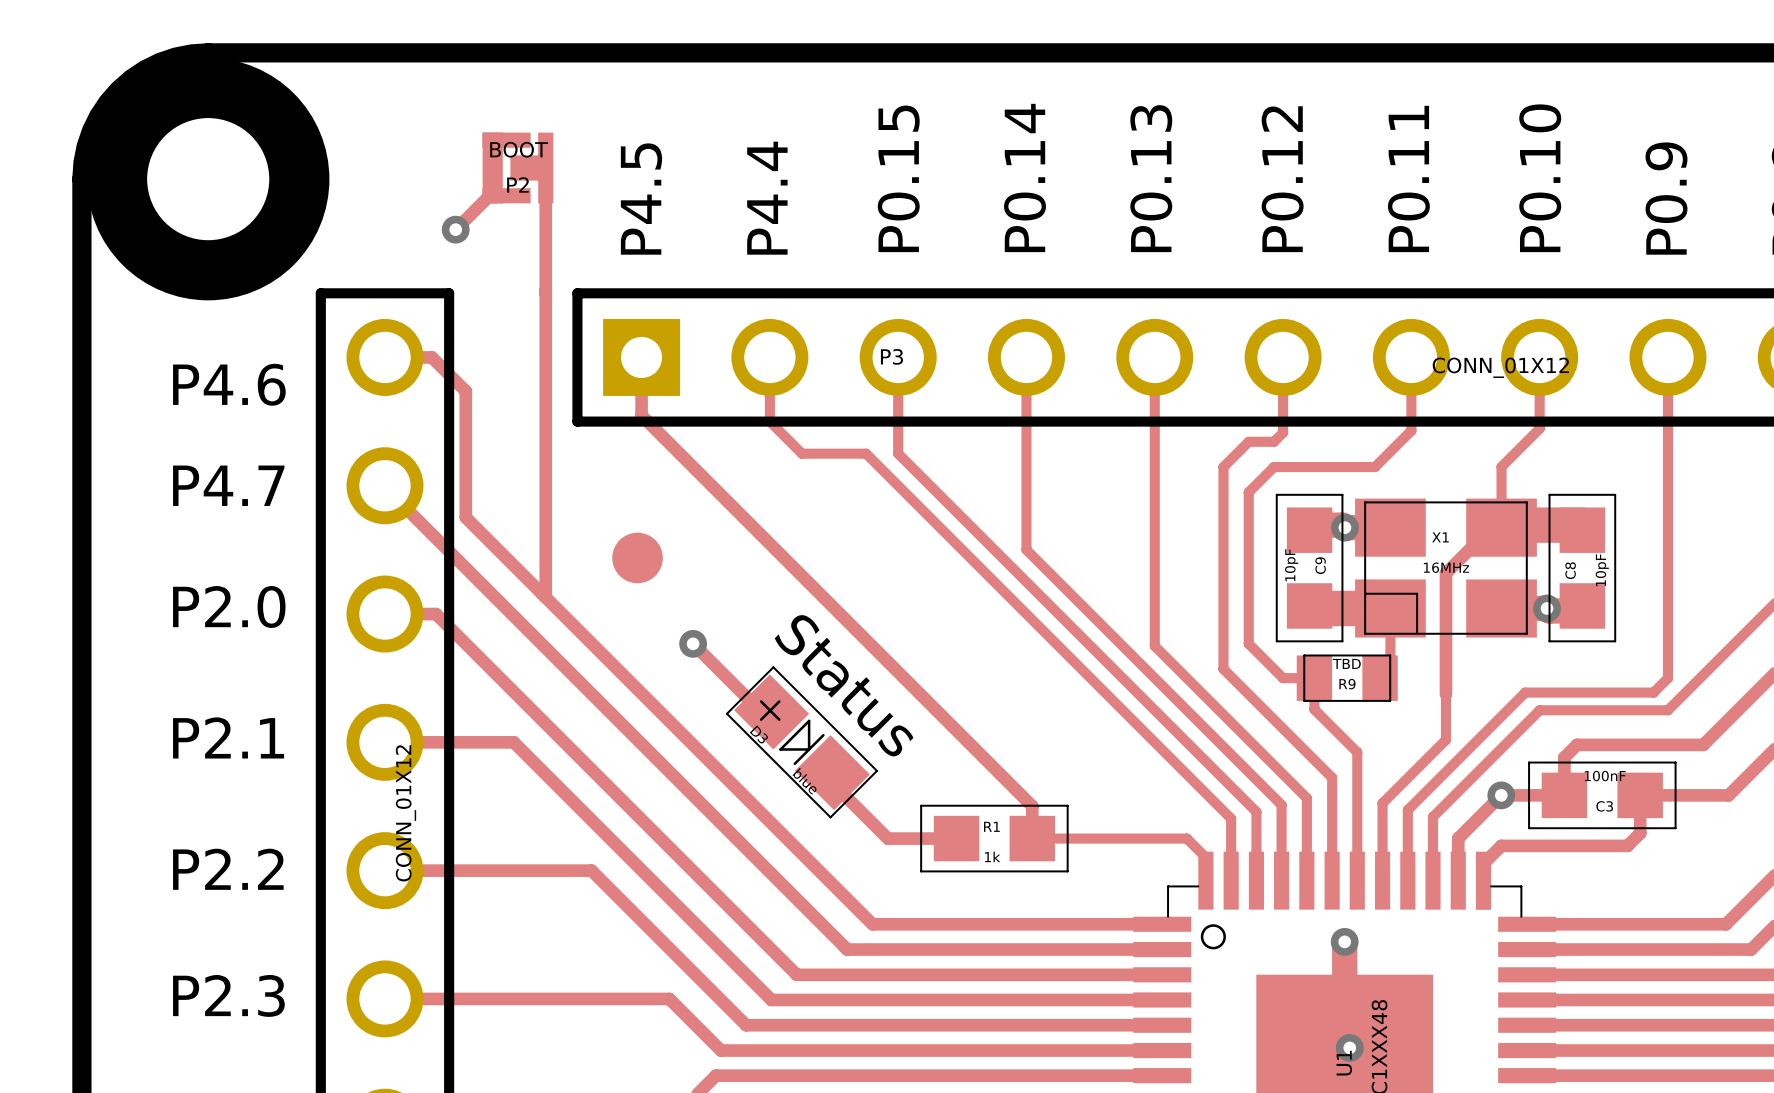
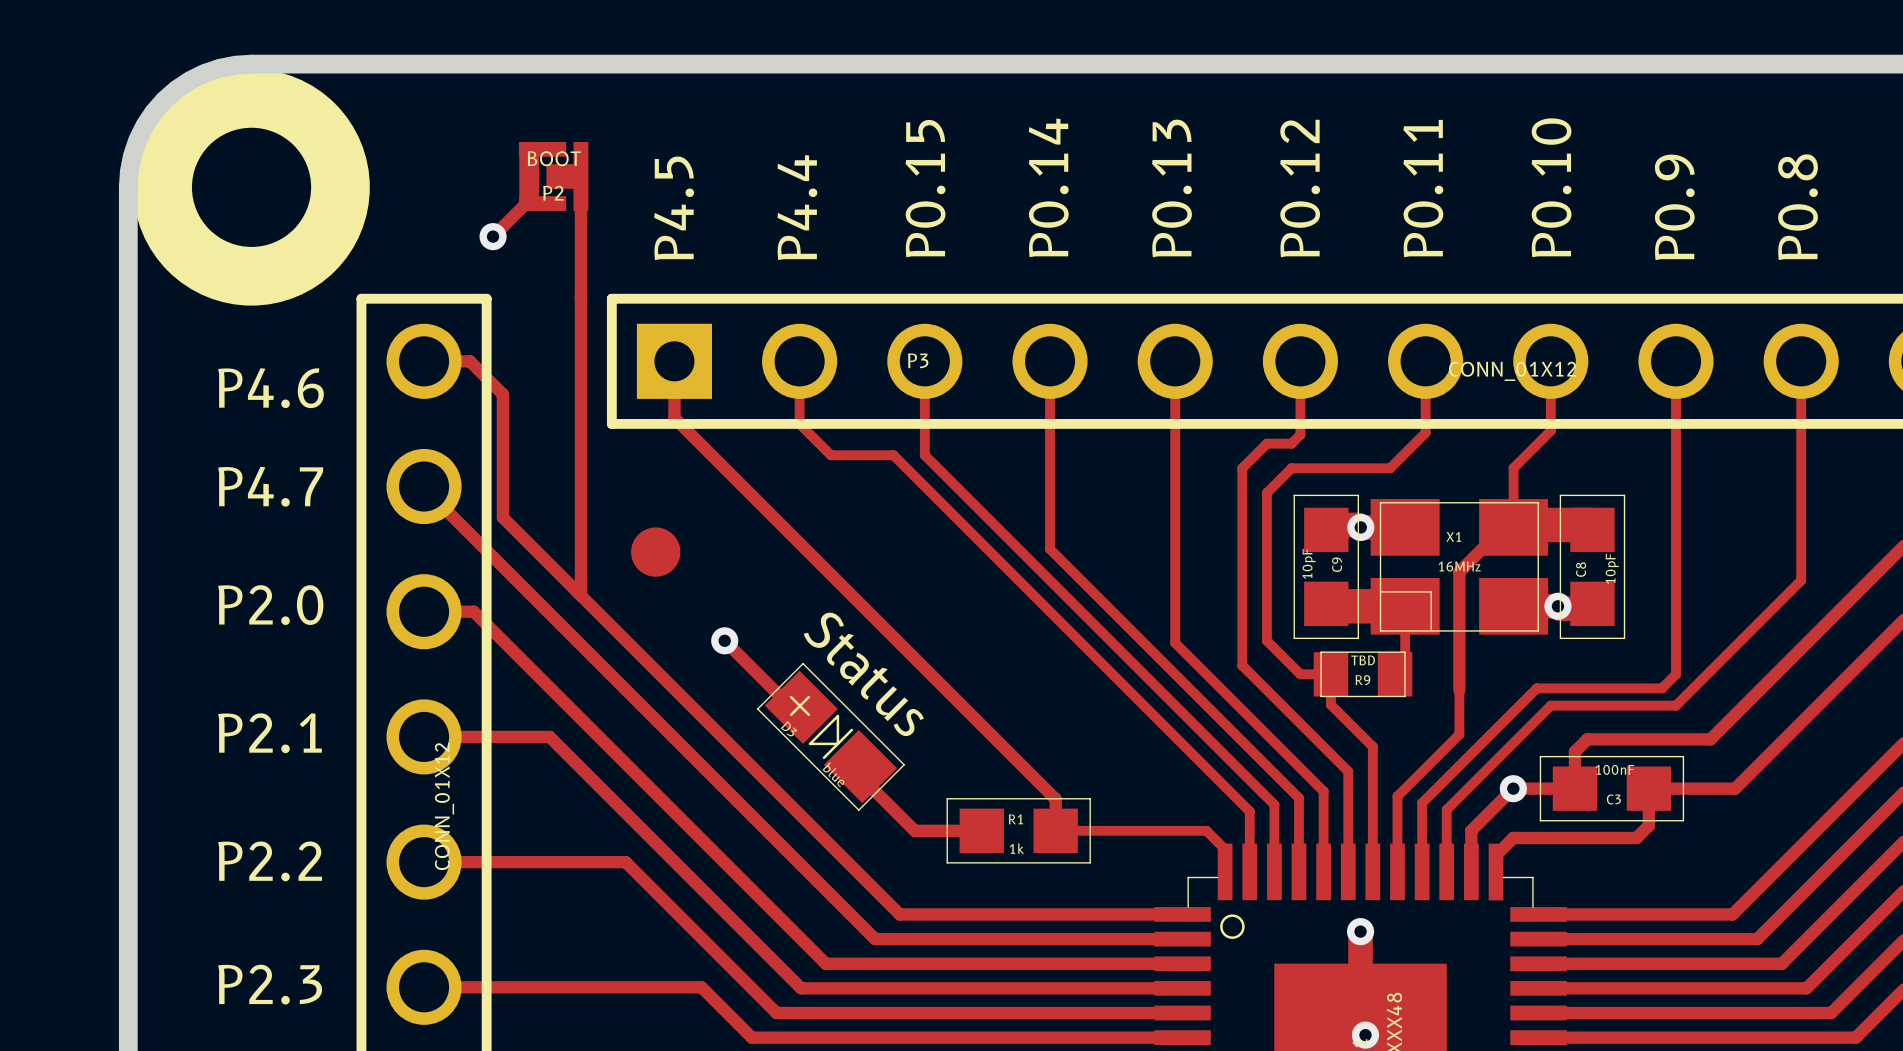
part position: (637, 557) -> (655, 552)

